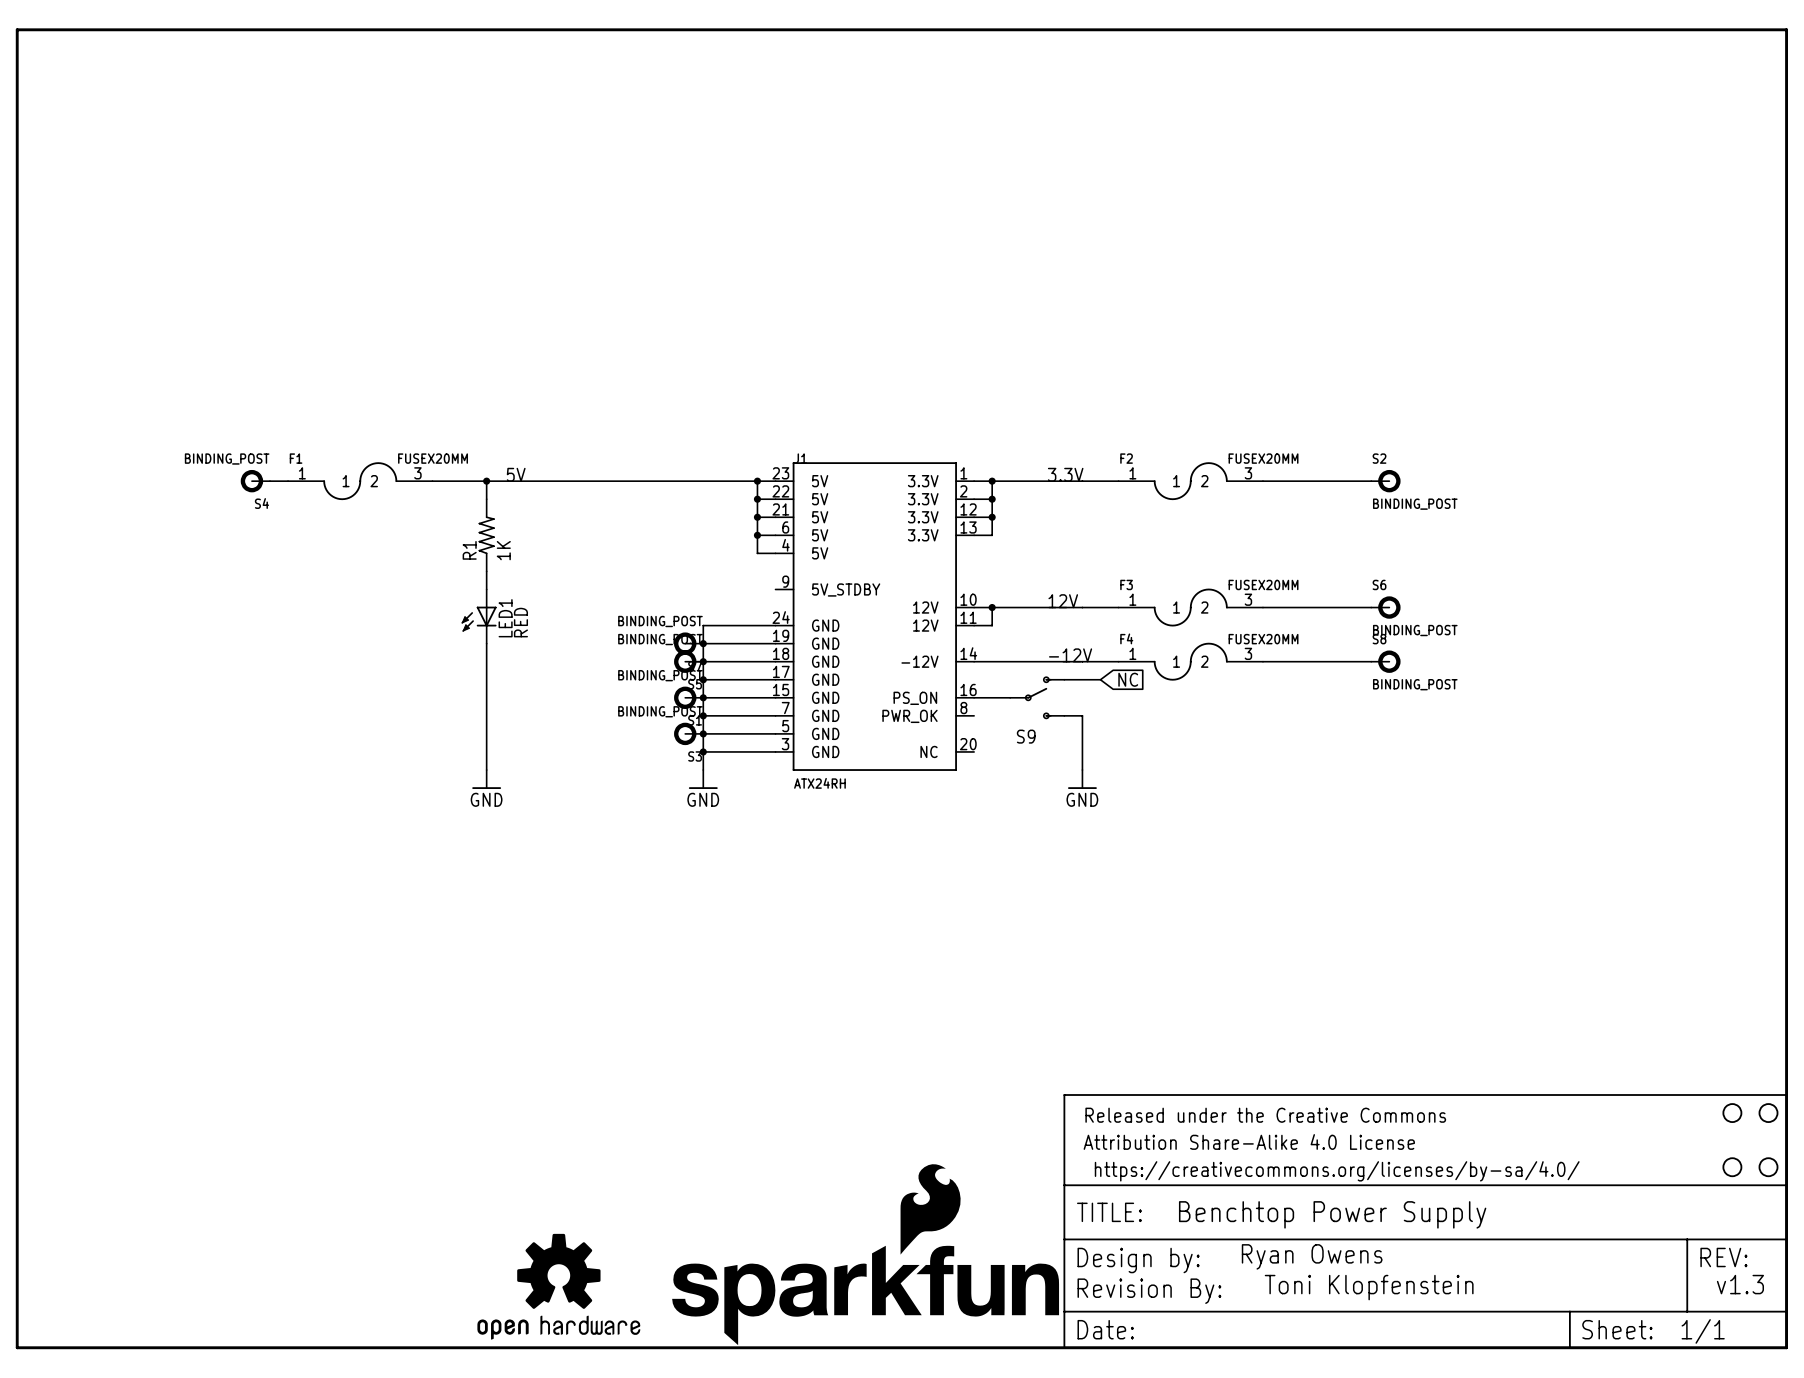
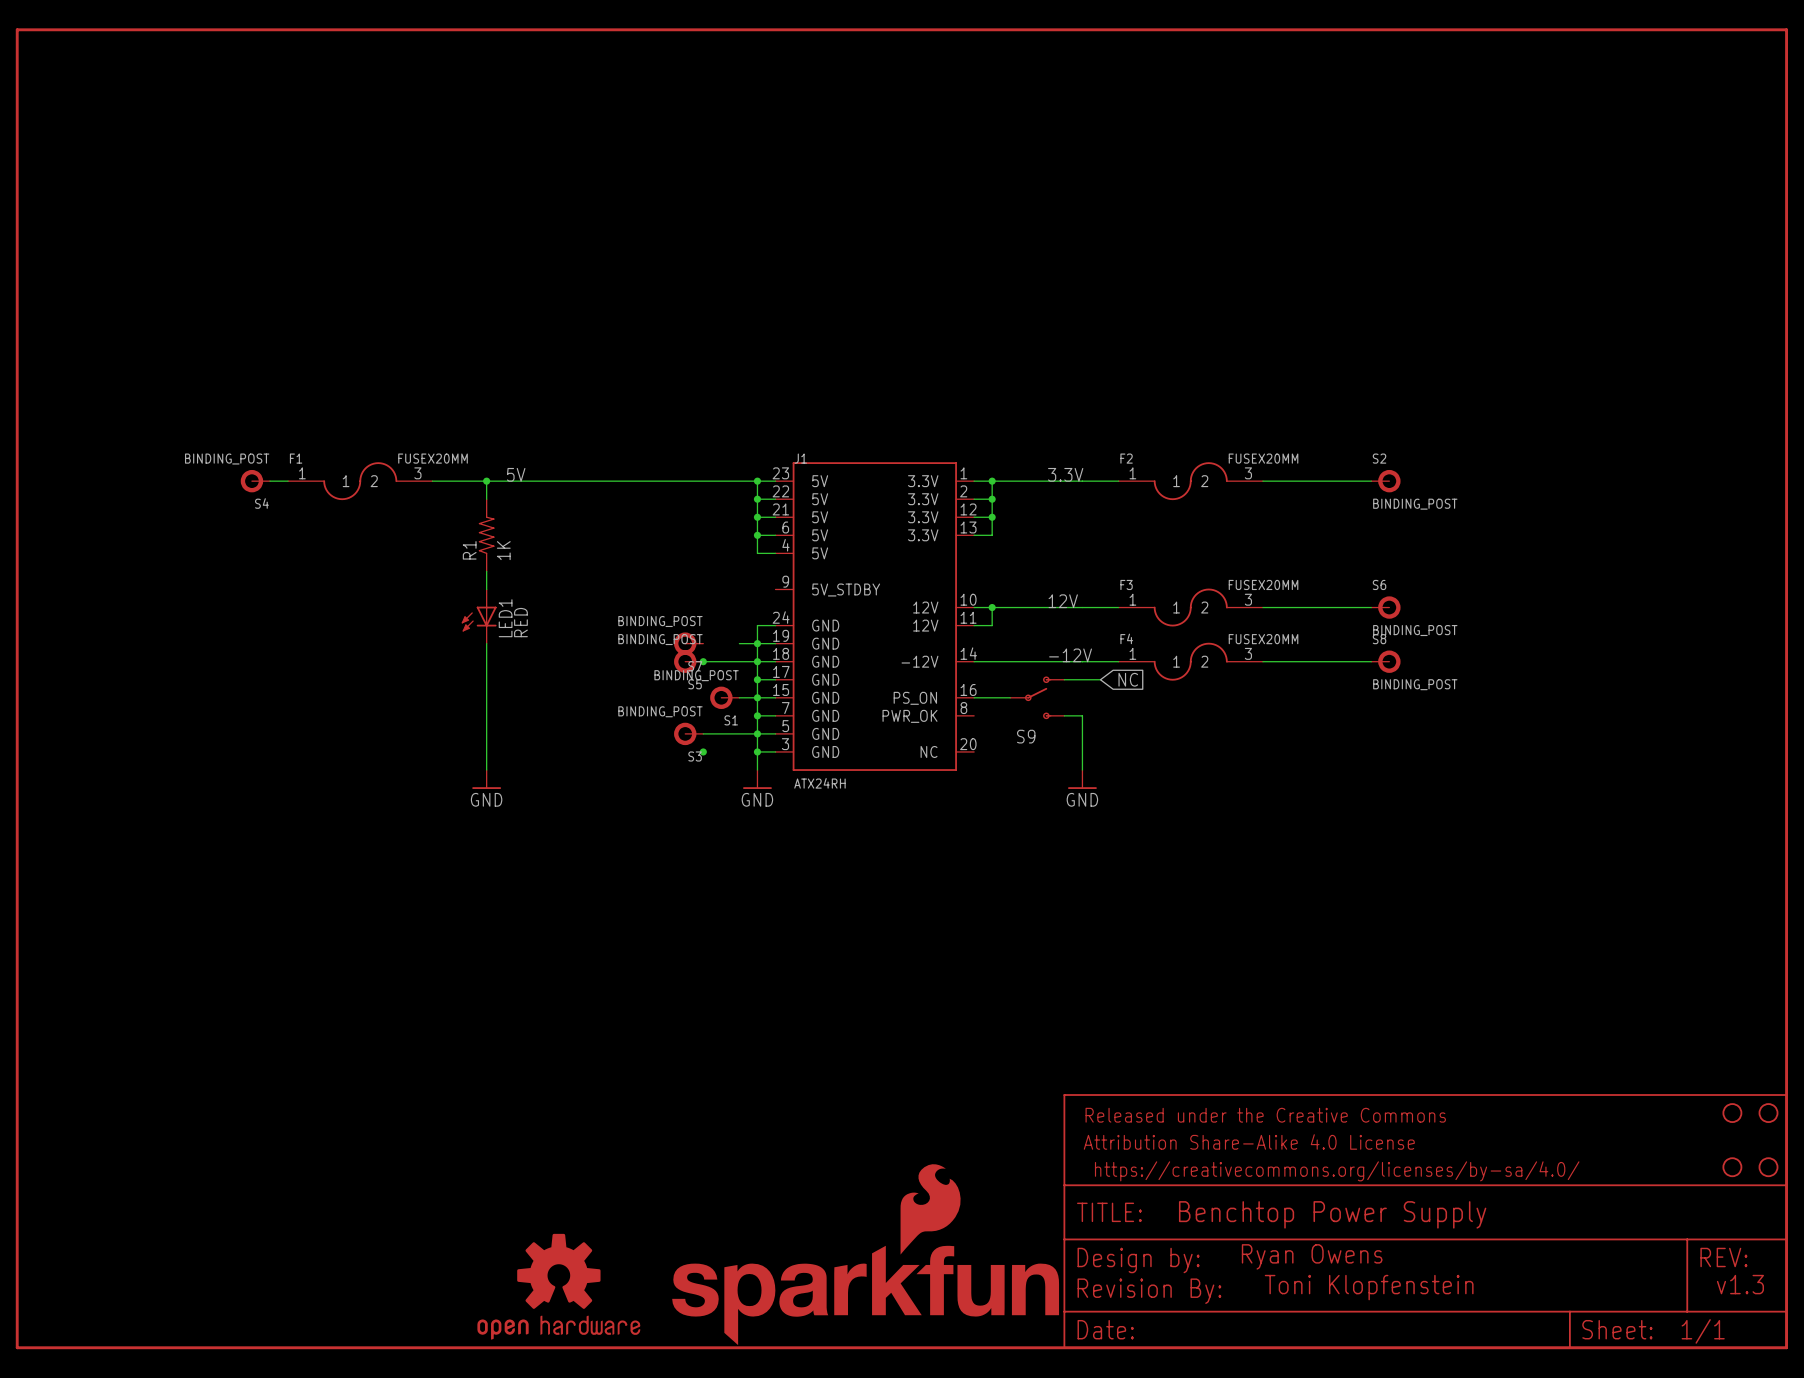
wire: (757, 625) (703, 625) (703, 770) -> (757, 625) (757, 770)
wire: (703, 643) (739, 643) -> none
junction: (703, 643) -> none
junction: none -> (757, 643)
junction: none -> (757, 661)
wire: (703, 679) (757, 679) -> none
junction: (703, 679) -> none
junction: none -> (757, 679)
S1 position: (688, 697) -> (724, 697)
junction: (703, 697) -> none
junction: none -> (757, 697)
wire: (703, 715) (757, 715) -> none
junction: (703, 715) -> none
junction: none -> (757, 715)
junction: (703, 733) -> none
junction: none -> (757, 733)
wire: (703, 751) (757, 751) -> none
junction: none -> (757, 751)
power symbol position: GND (703, 779) -> GND (757, 779)

